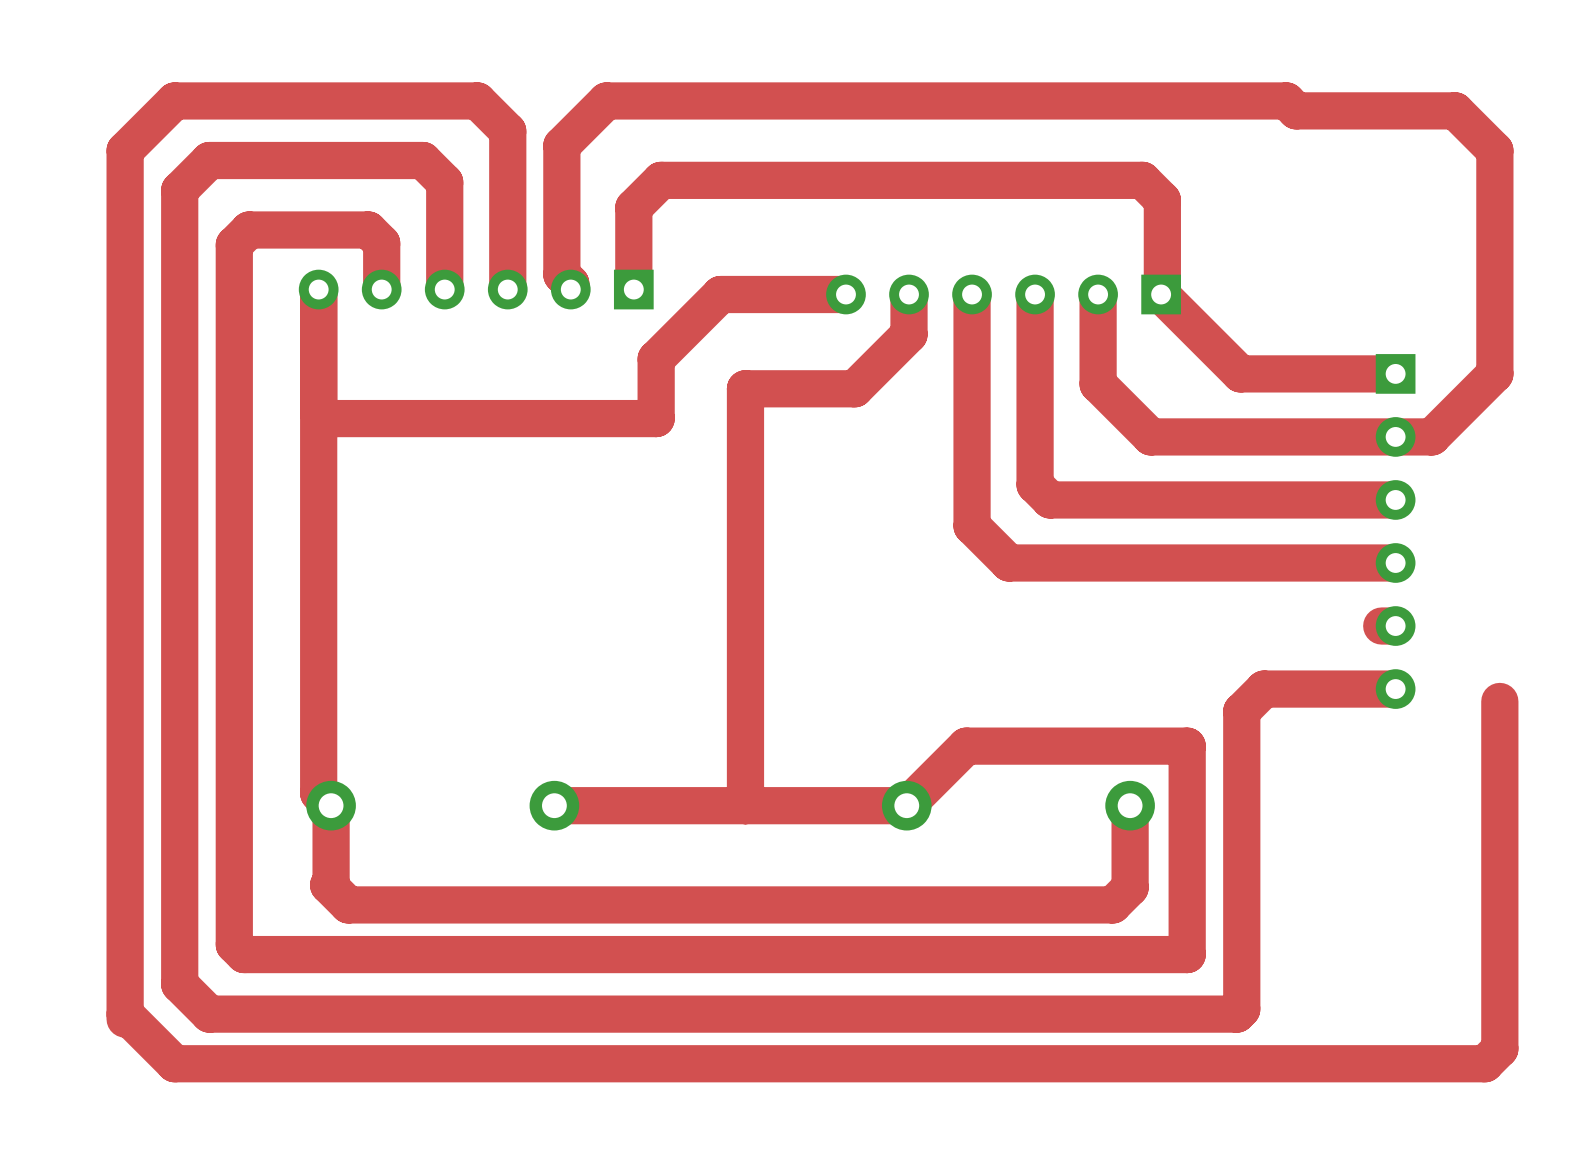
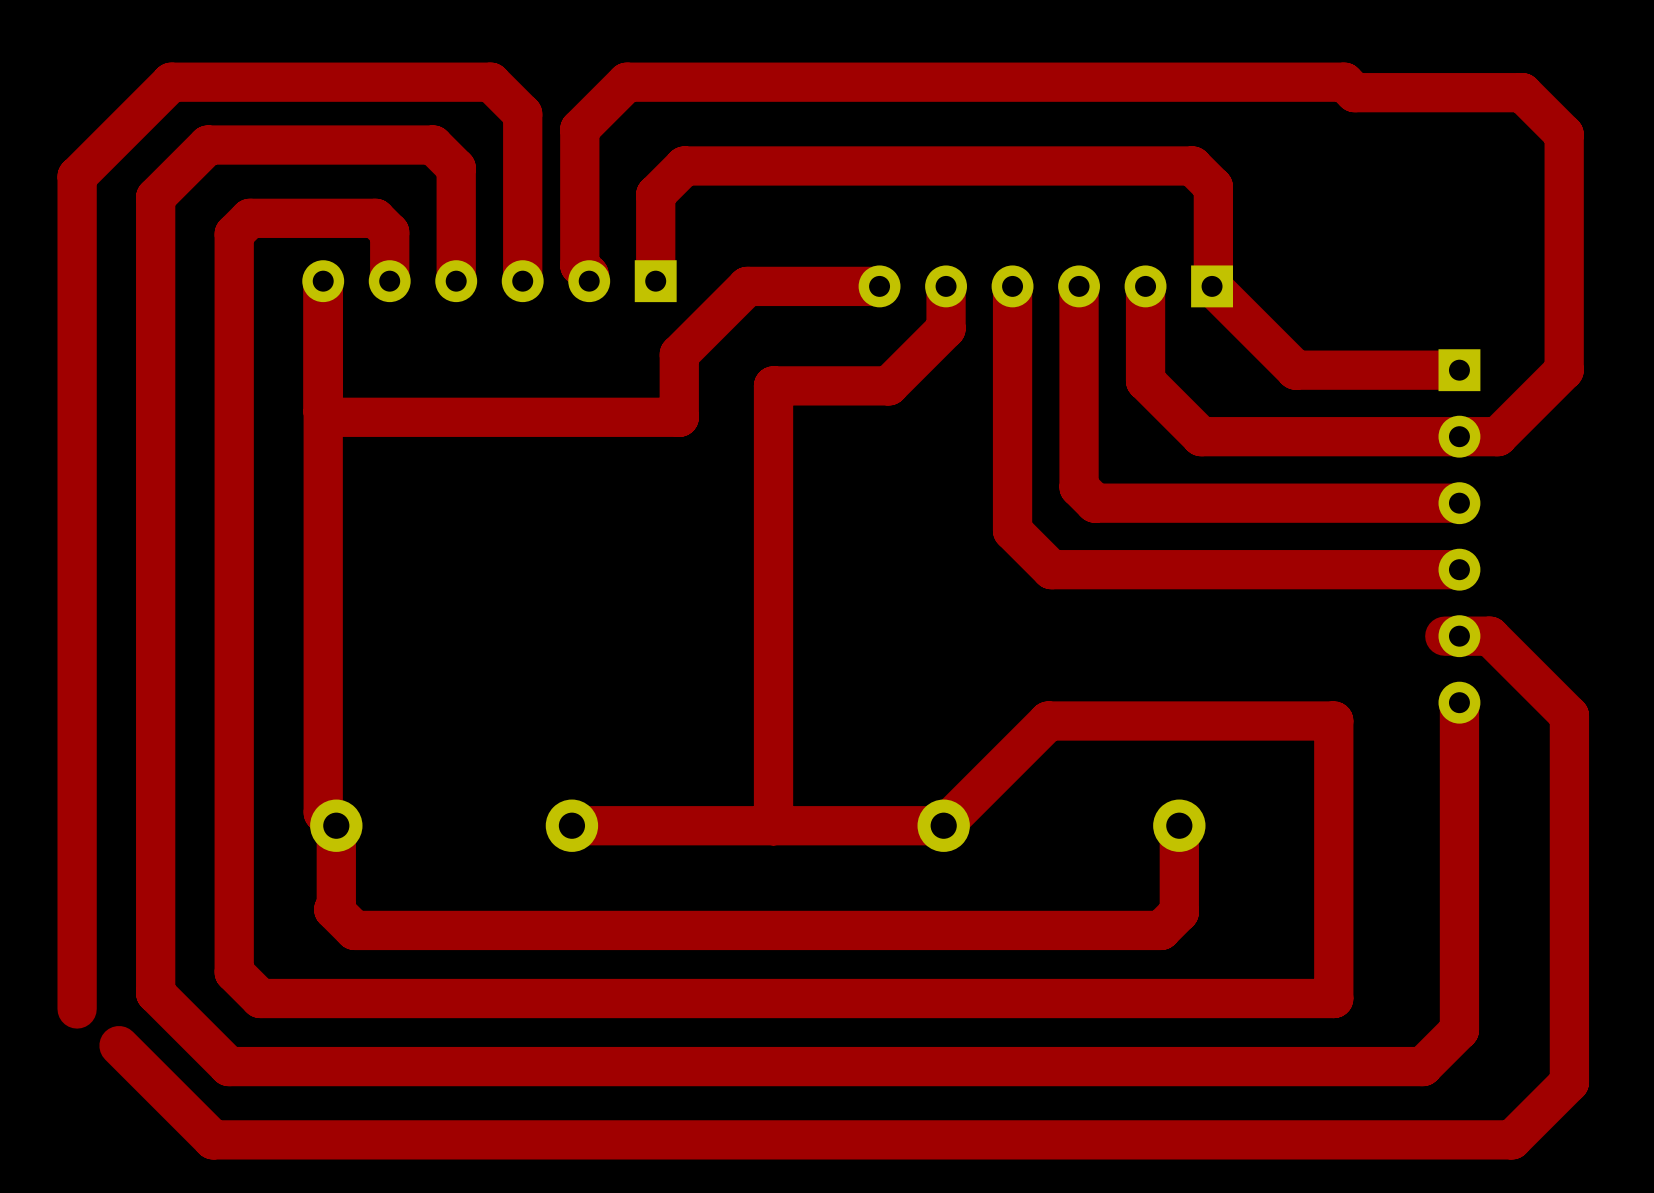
top track: (125, 150) (125, 1019) -> (119, 134) (77, 176) (77, 1008)
top track: (179, 190) (179, 984) -> (176, 176) (155, 197) (155, 993) (176, 1014)
top track: none -> (1459, 636) (1489, 636) (1569, 715)
top track: (1395, 689) (1264, 689) (1241, 711) (1241, 1009) (1236, 1014) (209, 1014) -> (1459, 702) (1459, 1029) (1422, 1066) (228, 1066) (208, 1045)
top track: (966, 746) (1187, 746) (1187, 954) (244, 954) -> (1006, 762) (1048, 721) (1333, 721) (1333, 998) (260, 998) (244, 982)
top track: (1484, 1063) (174, 1063) -> (1553, 1098) (1511, 1139) (213, 1139) (171, 1098)

